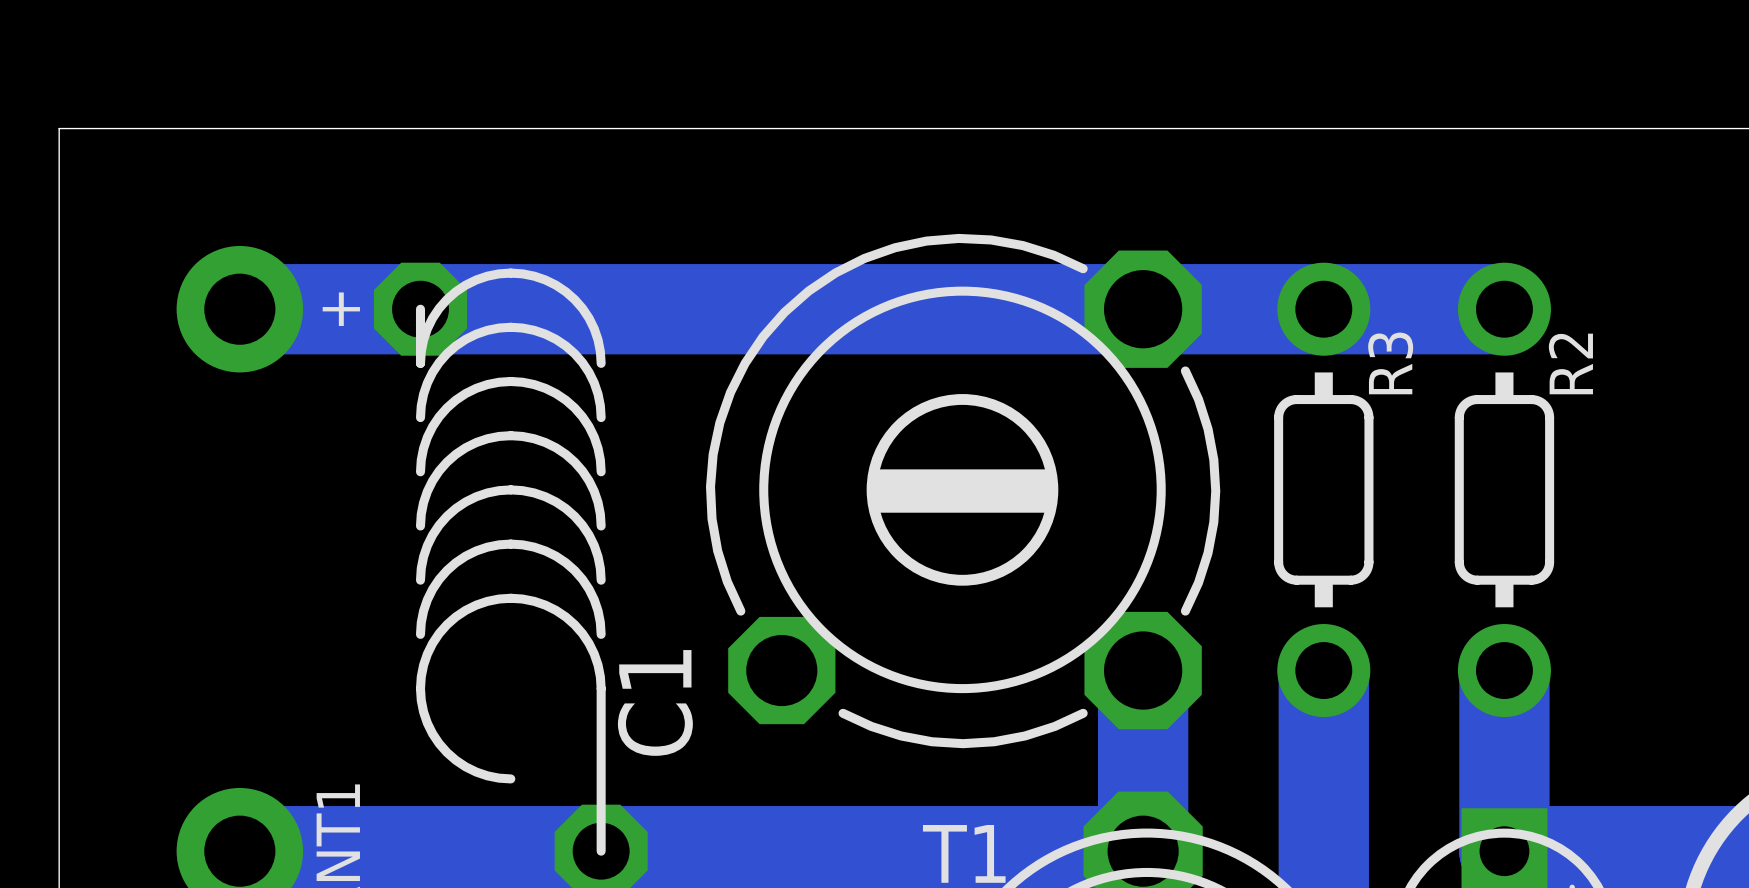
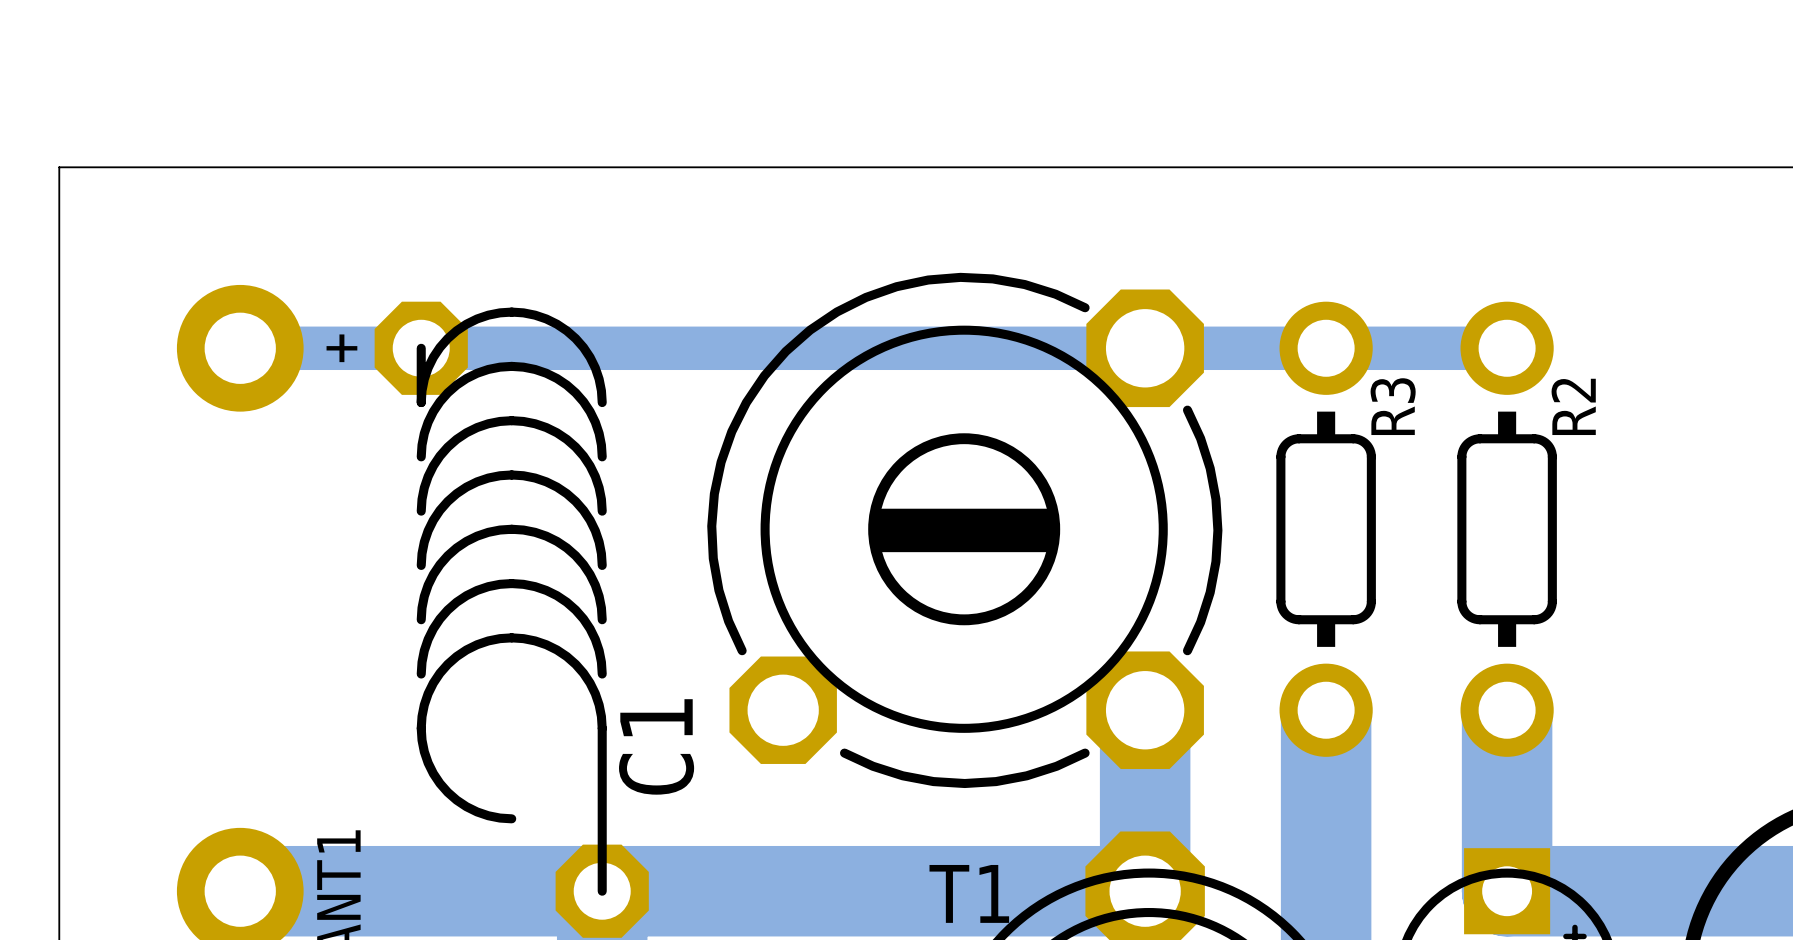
bottom track width: thick (239, 309) (1504, 309) -> thin (240, 348) (1507, 348)

